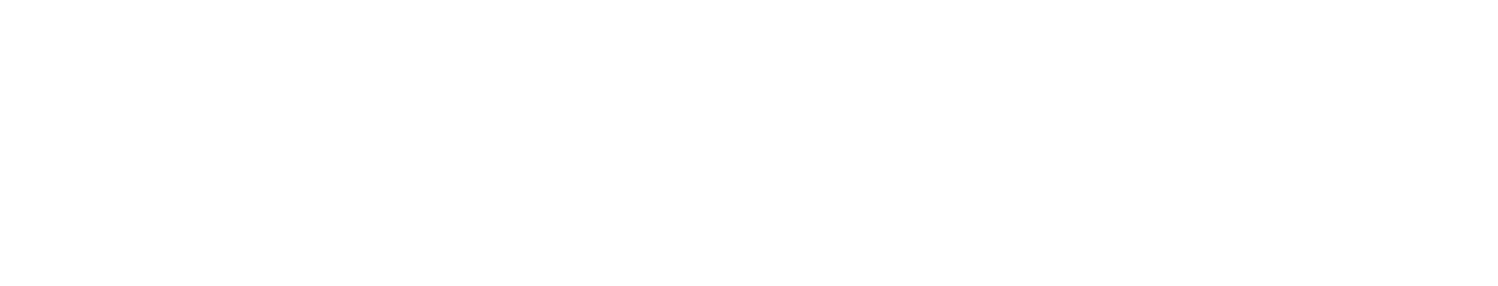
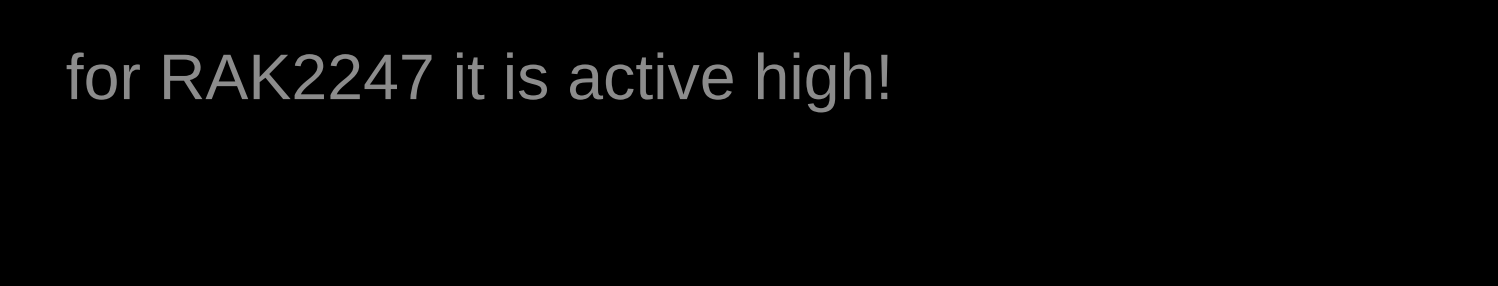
text: none -> for RAK2247 it is active high! (477, 82)

